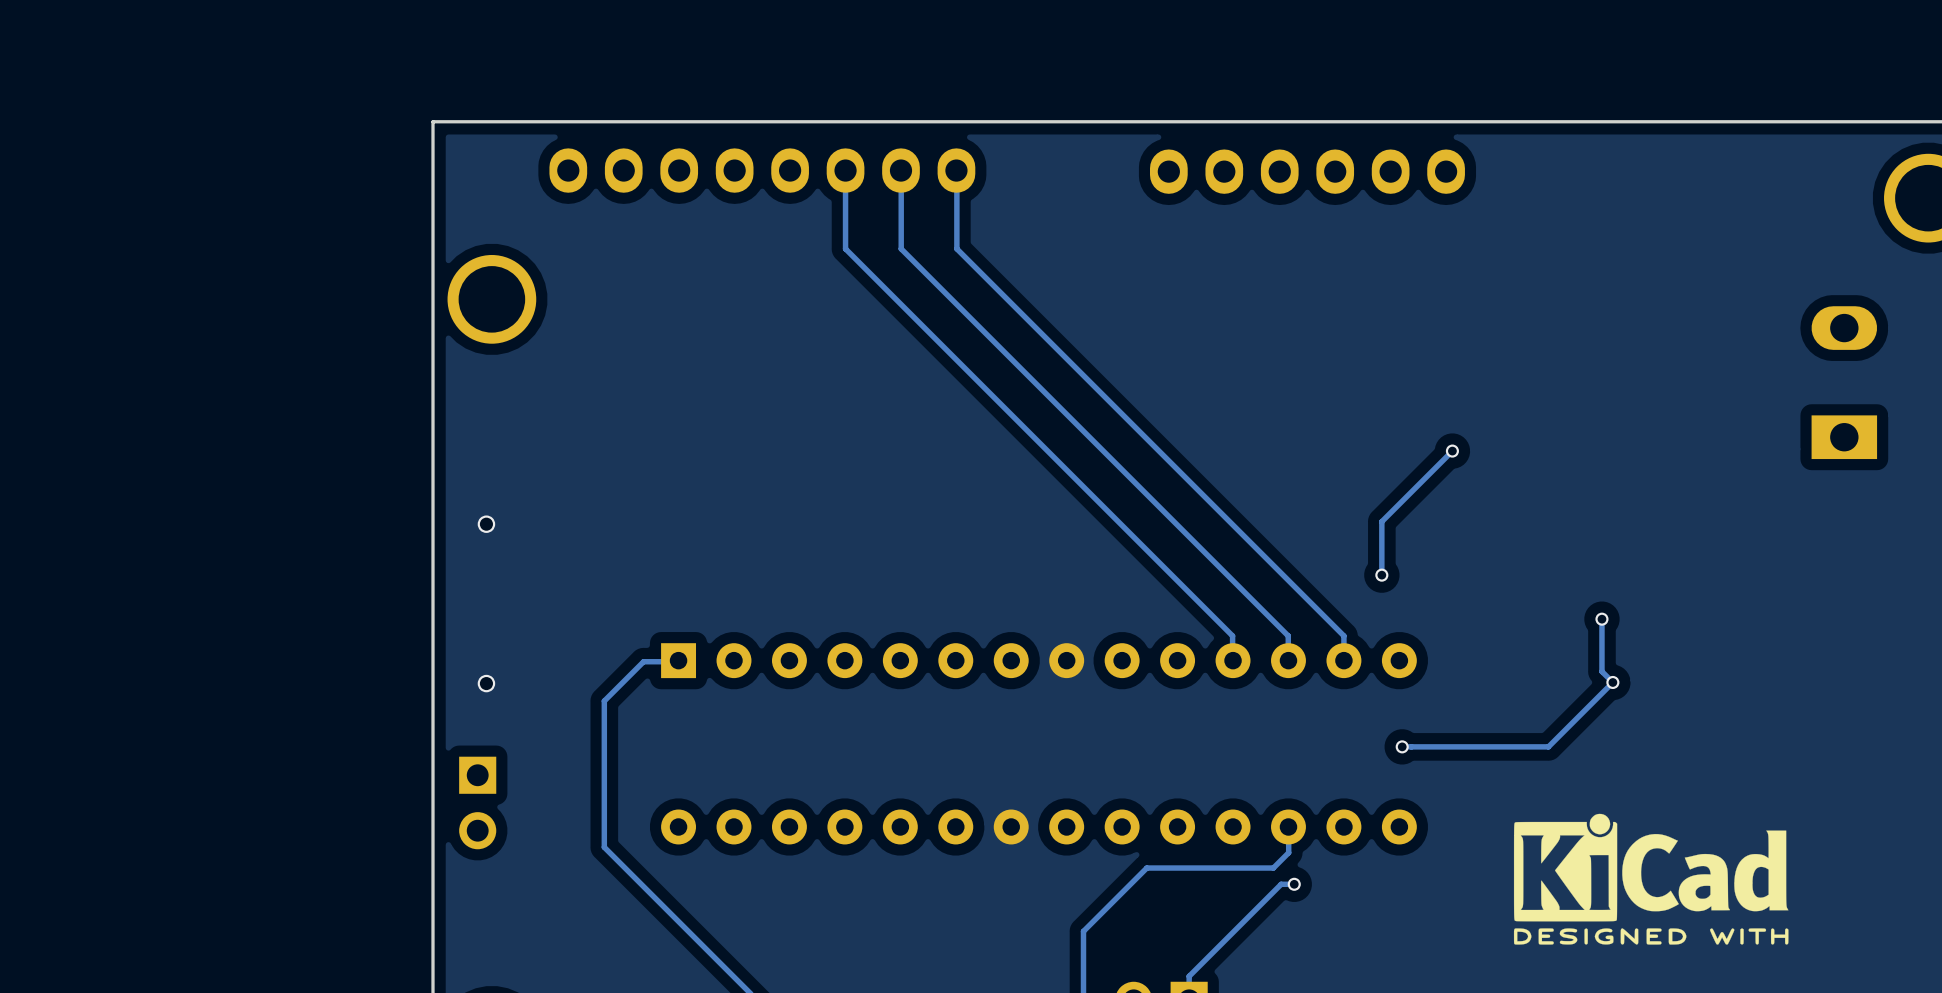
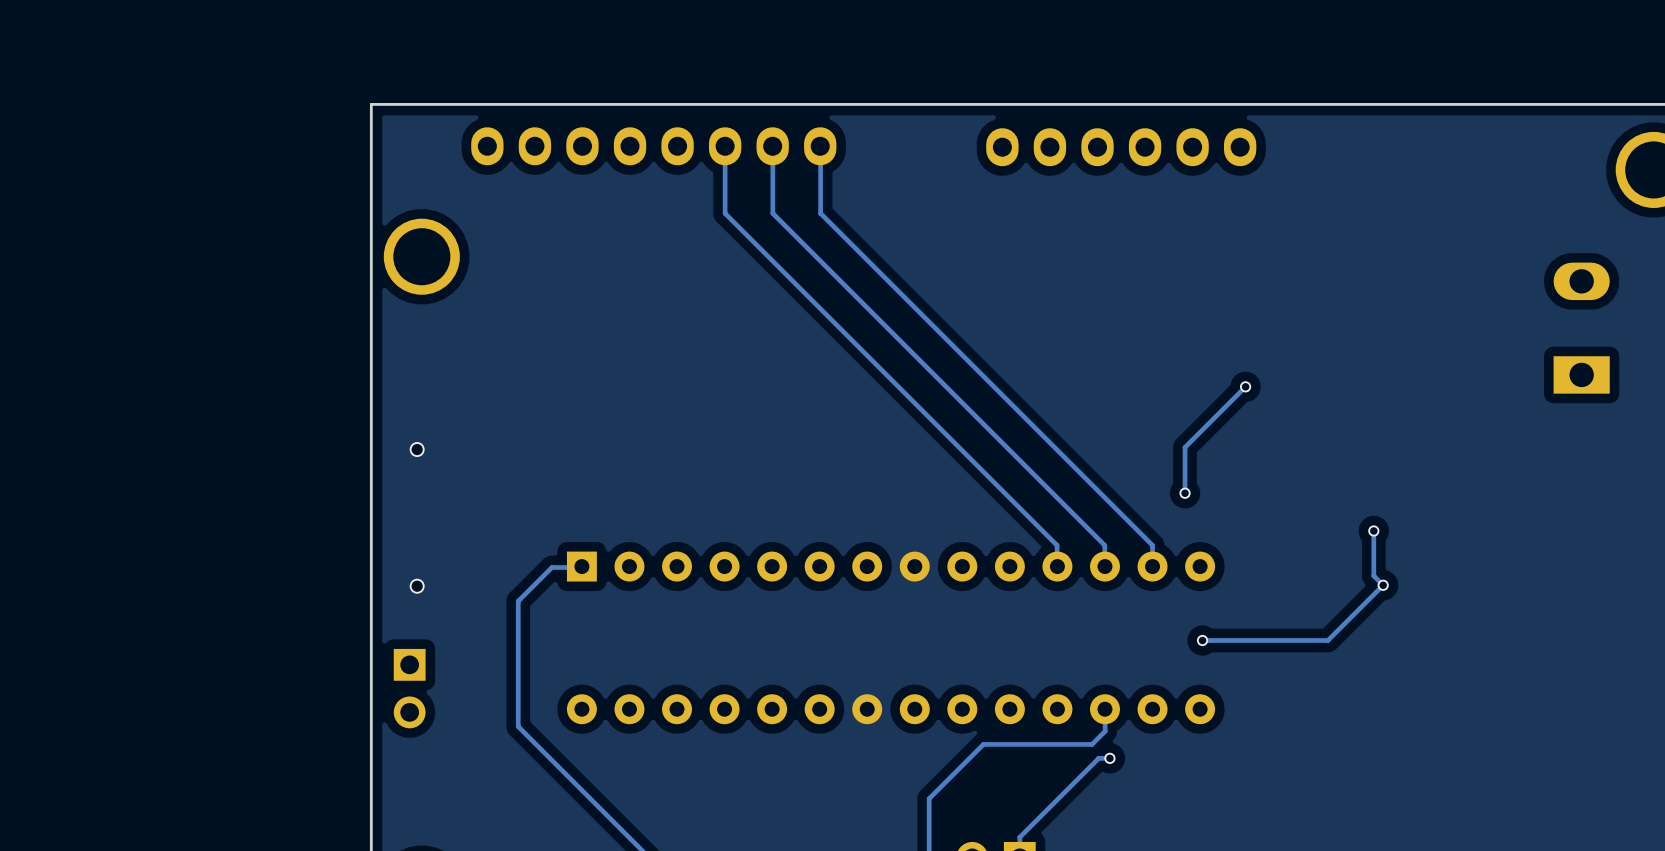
drawing: [1513, 813, 1789, 945] -> none

